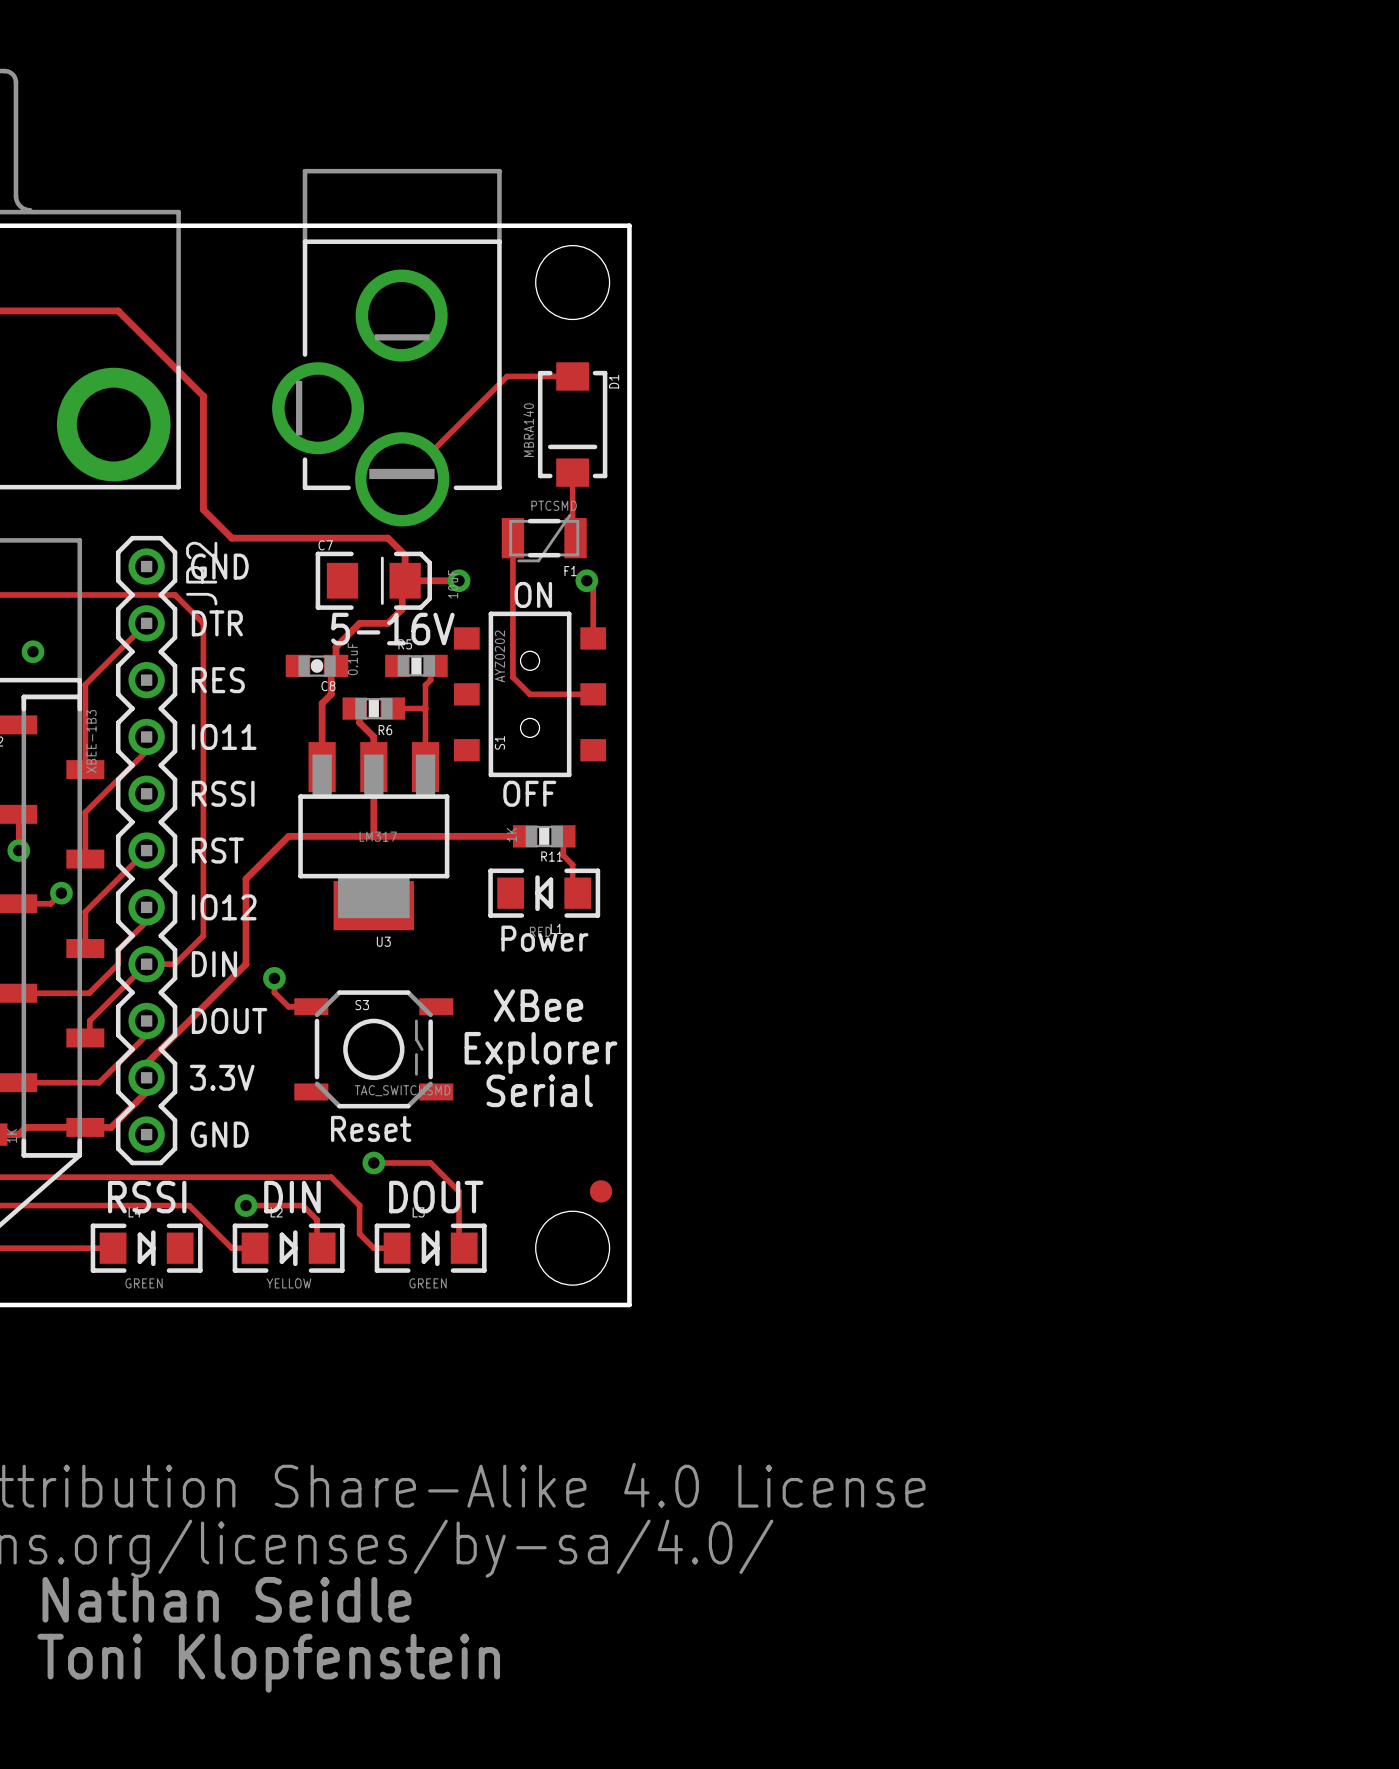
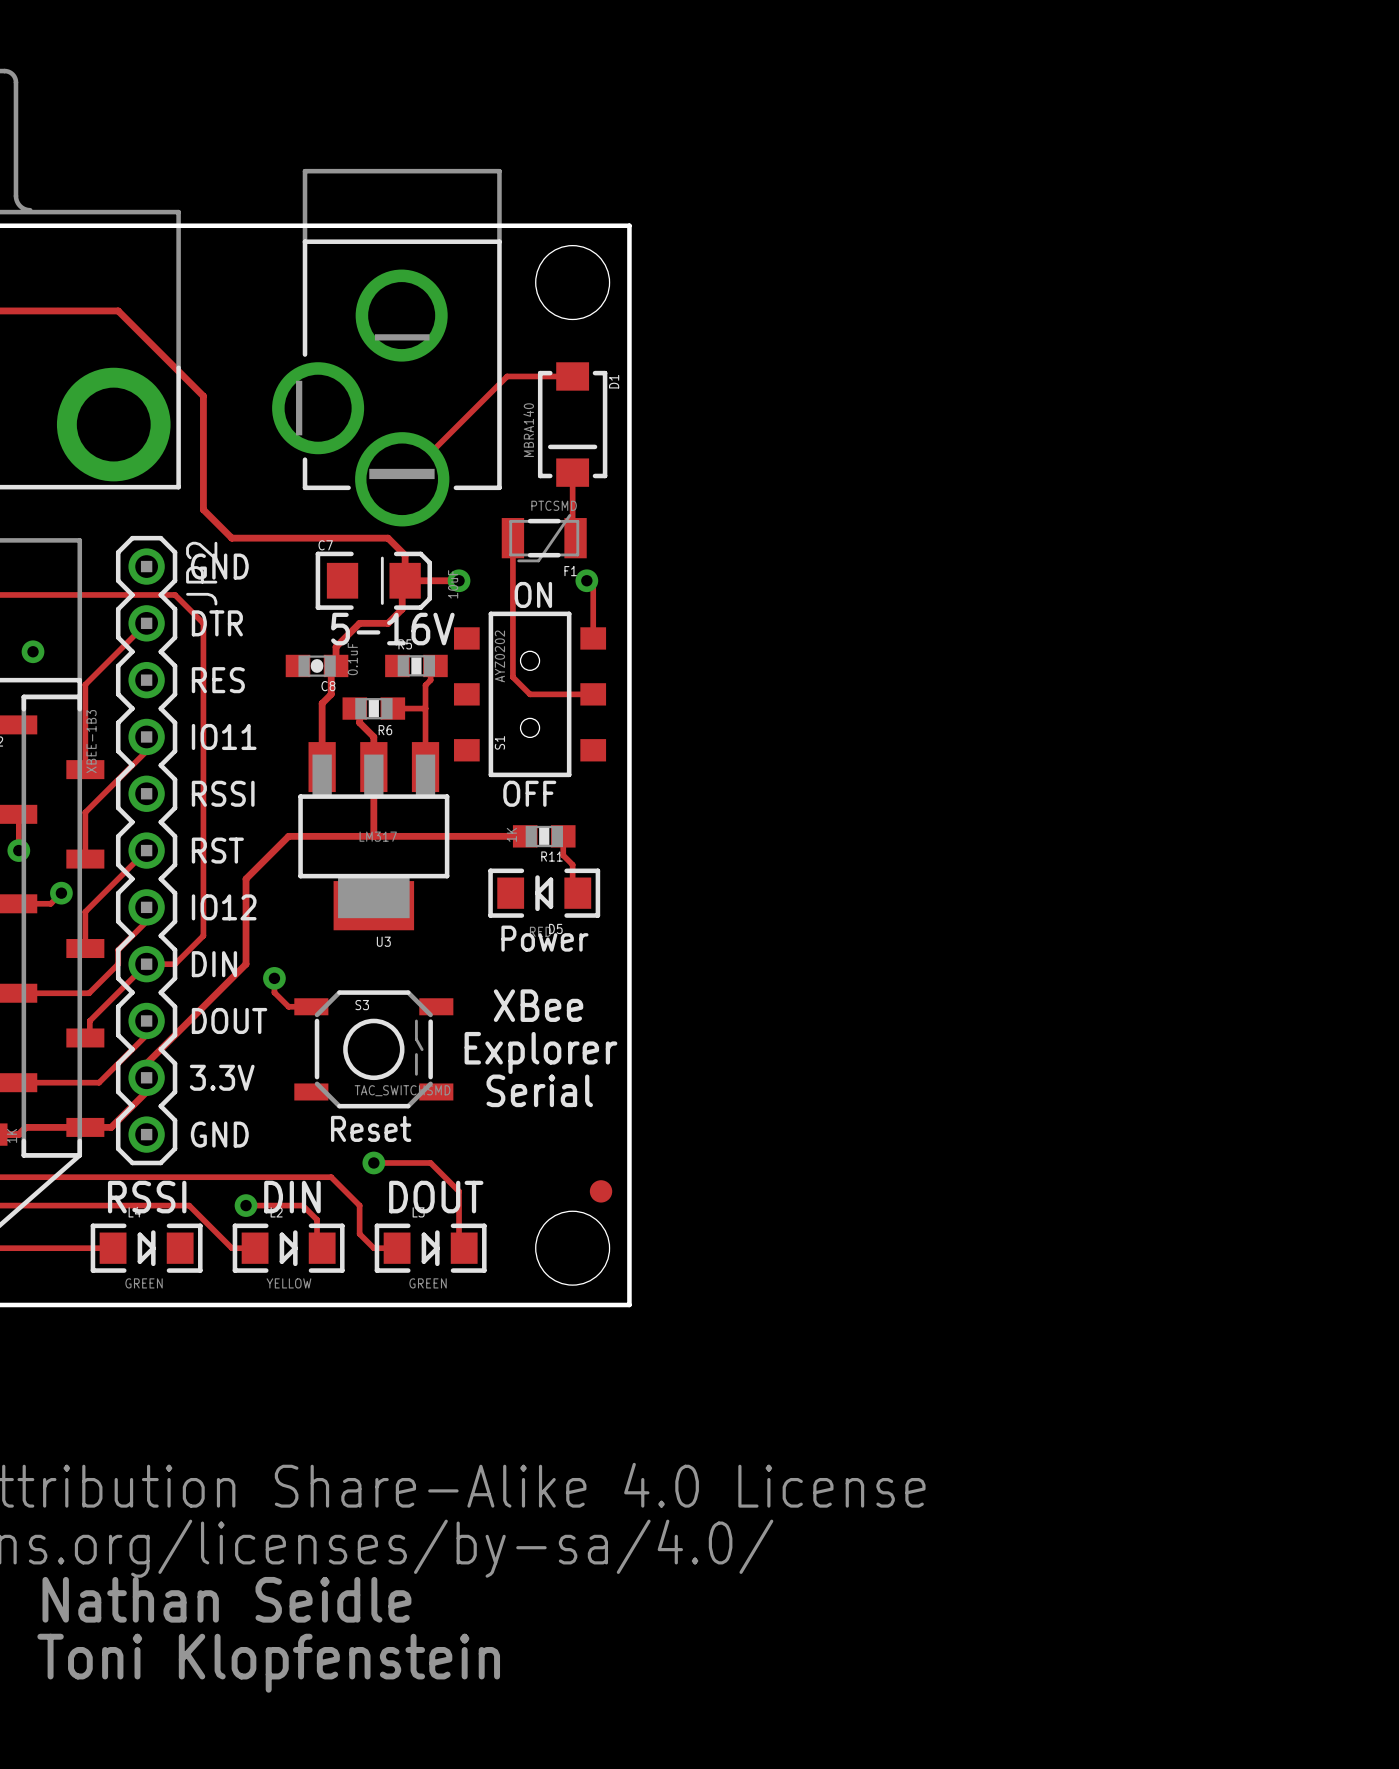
L1 name: L1 (556, 928) -> D5 (555, 928)

